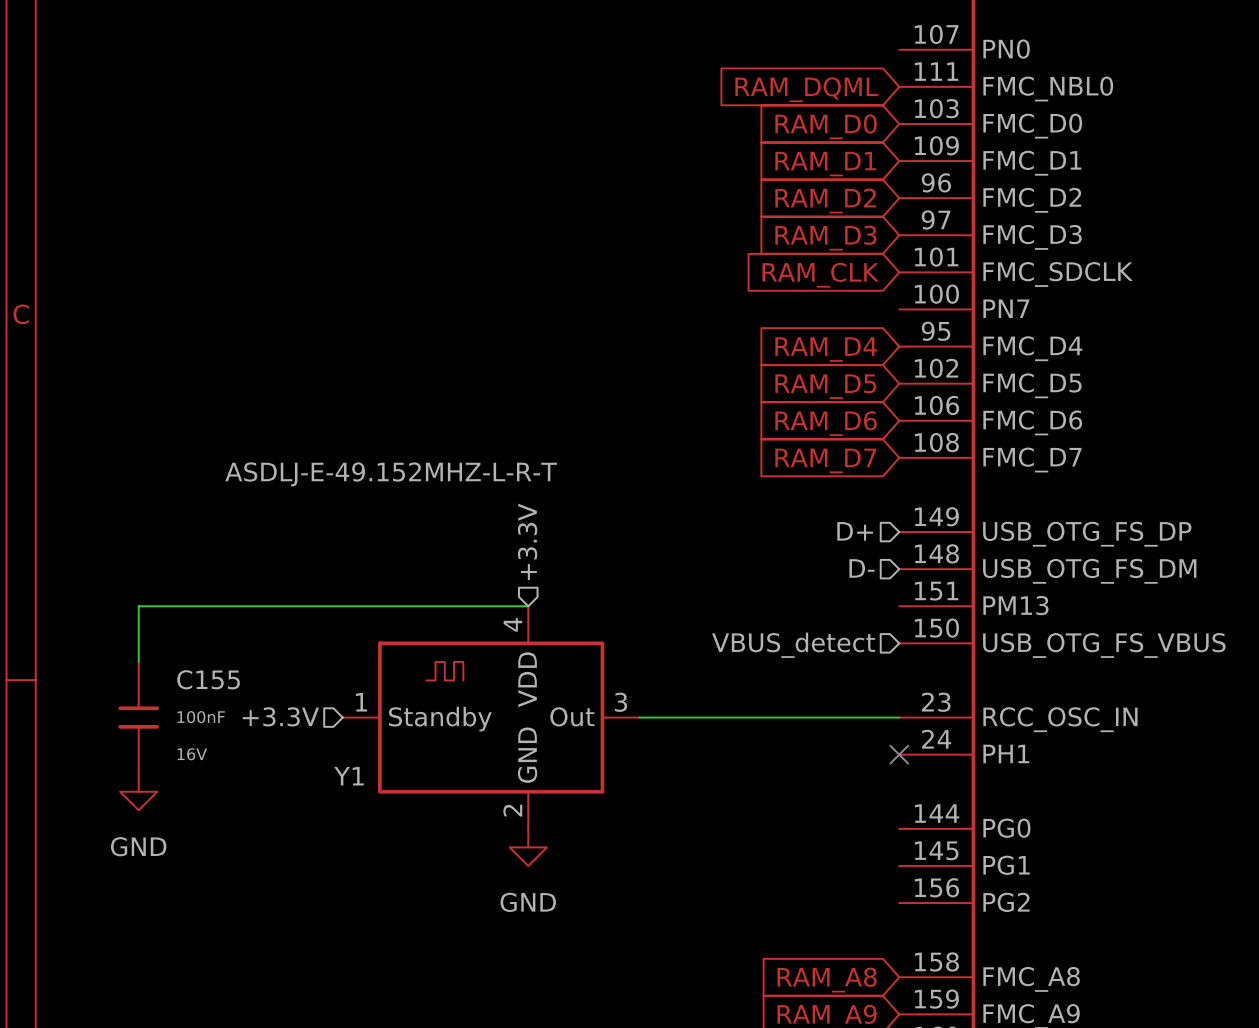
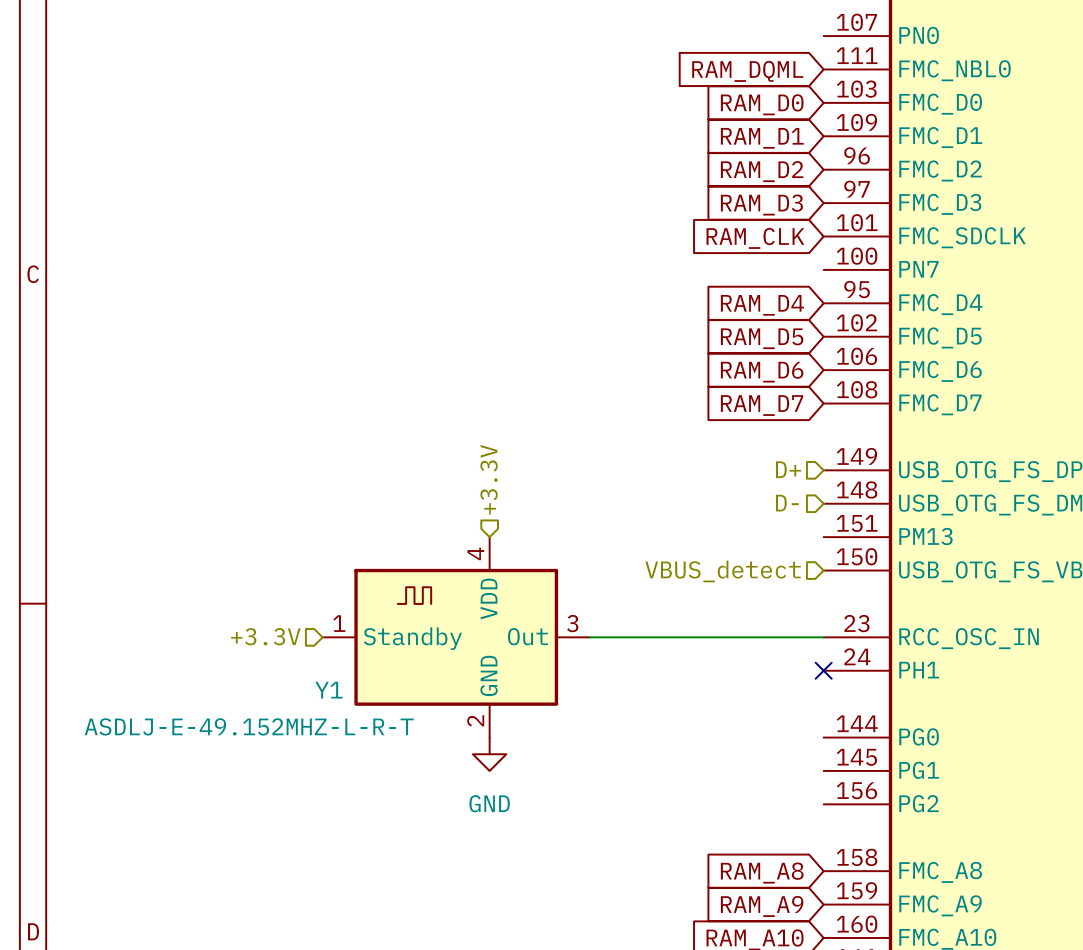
Y1 value position: ASDLJ-E-49.152MHZ-L-R-T (391, 474) -> ASDLJ-E-49.152MHZ-L-R-T (249, 726)
wire: (528, 606) (138, 606) (138, 661) -> none
C155: 100nF (138, 717) -> none
power symbol: GND (138, 791) -> none

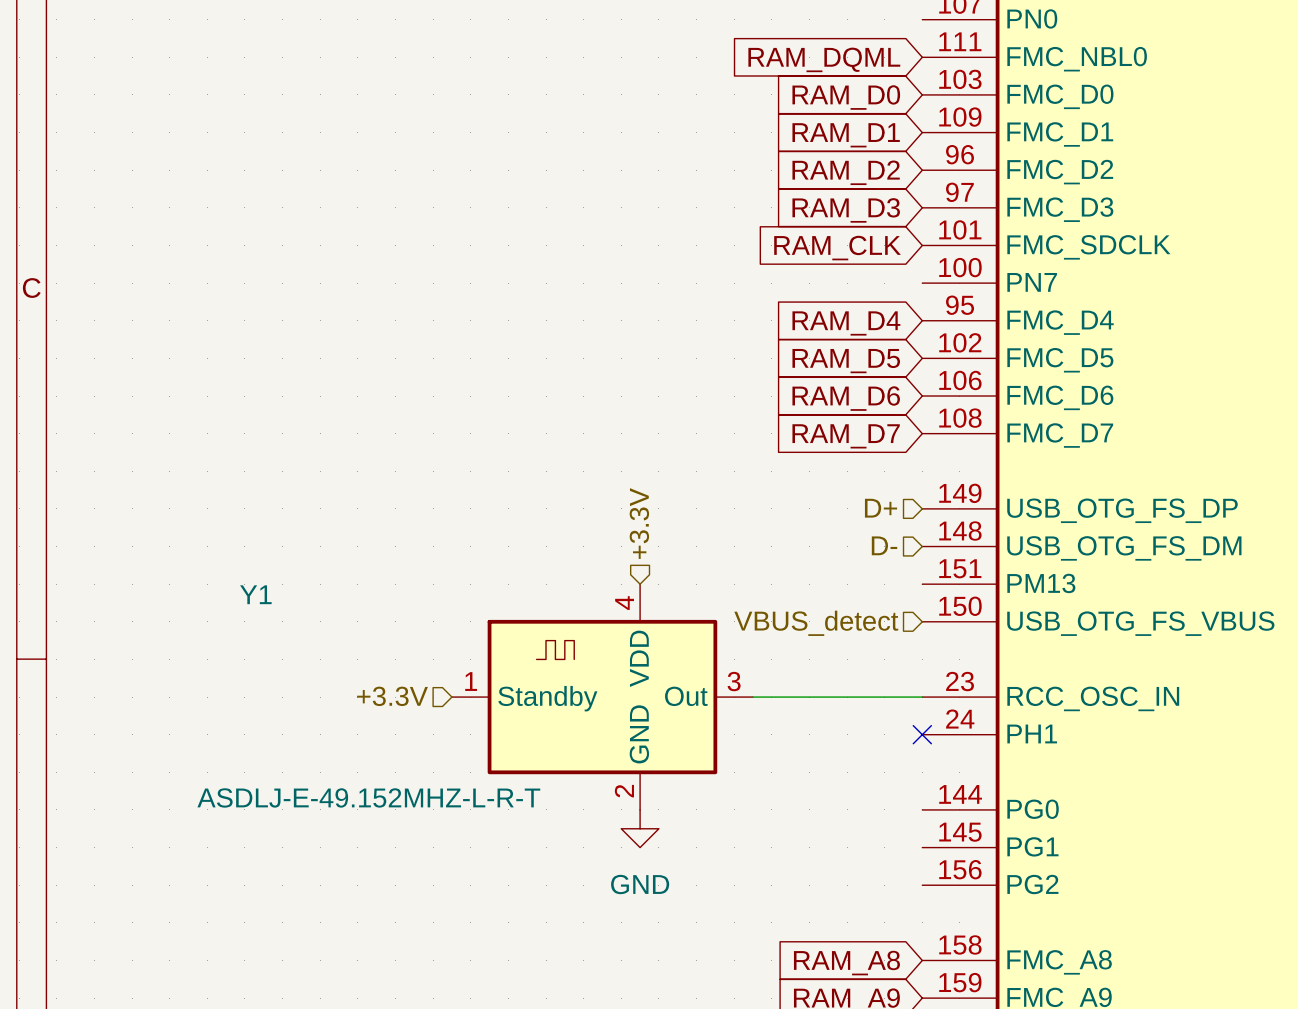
hierarchical label: +3.3V (489, 479) -> none
hierarchical label: none -> +3.3V (639, 523)
hierarchical label position: +3.3V (265, 636) -> +3.3V (392, 696)
Y1 position: (456, 637) -> (602, 697)
Y1 name position: Y1 (328, 690) -> Y1 (255, 594)
power symbol position: GND (489, 754) -> GND (640, 828)

